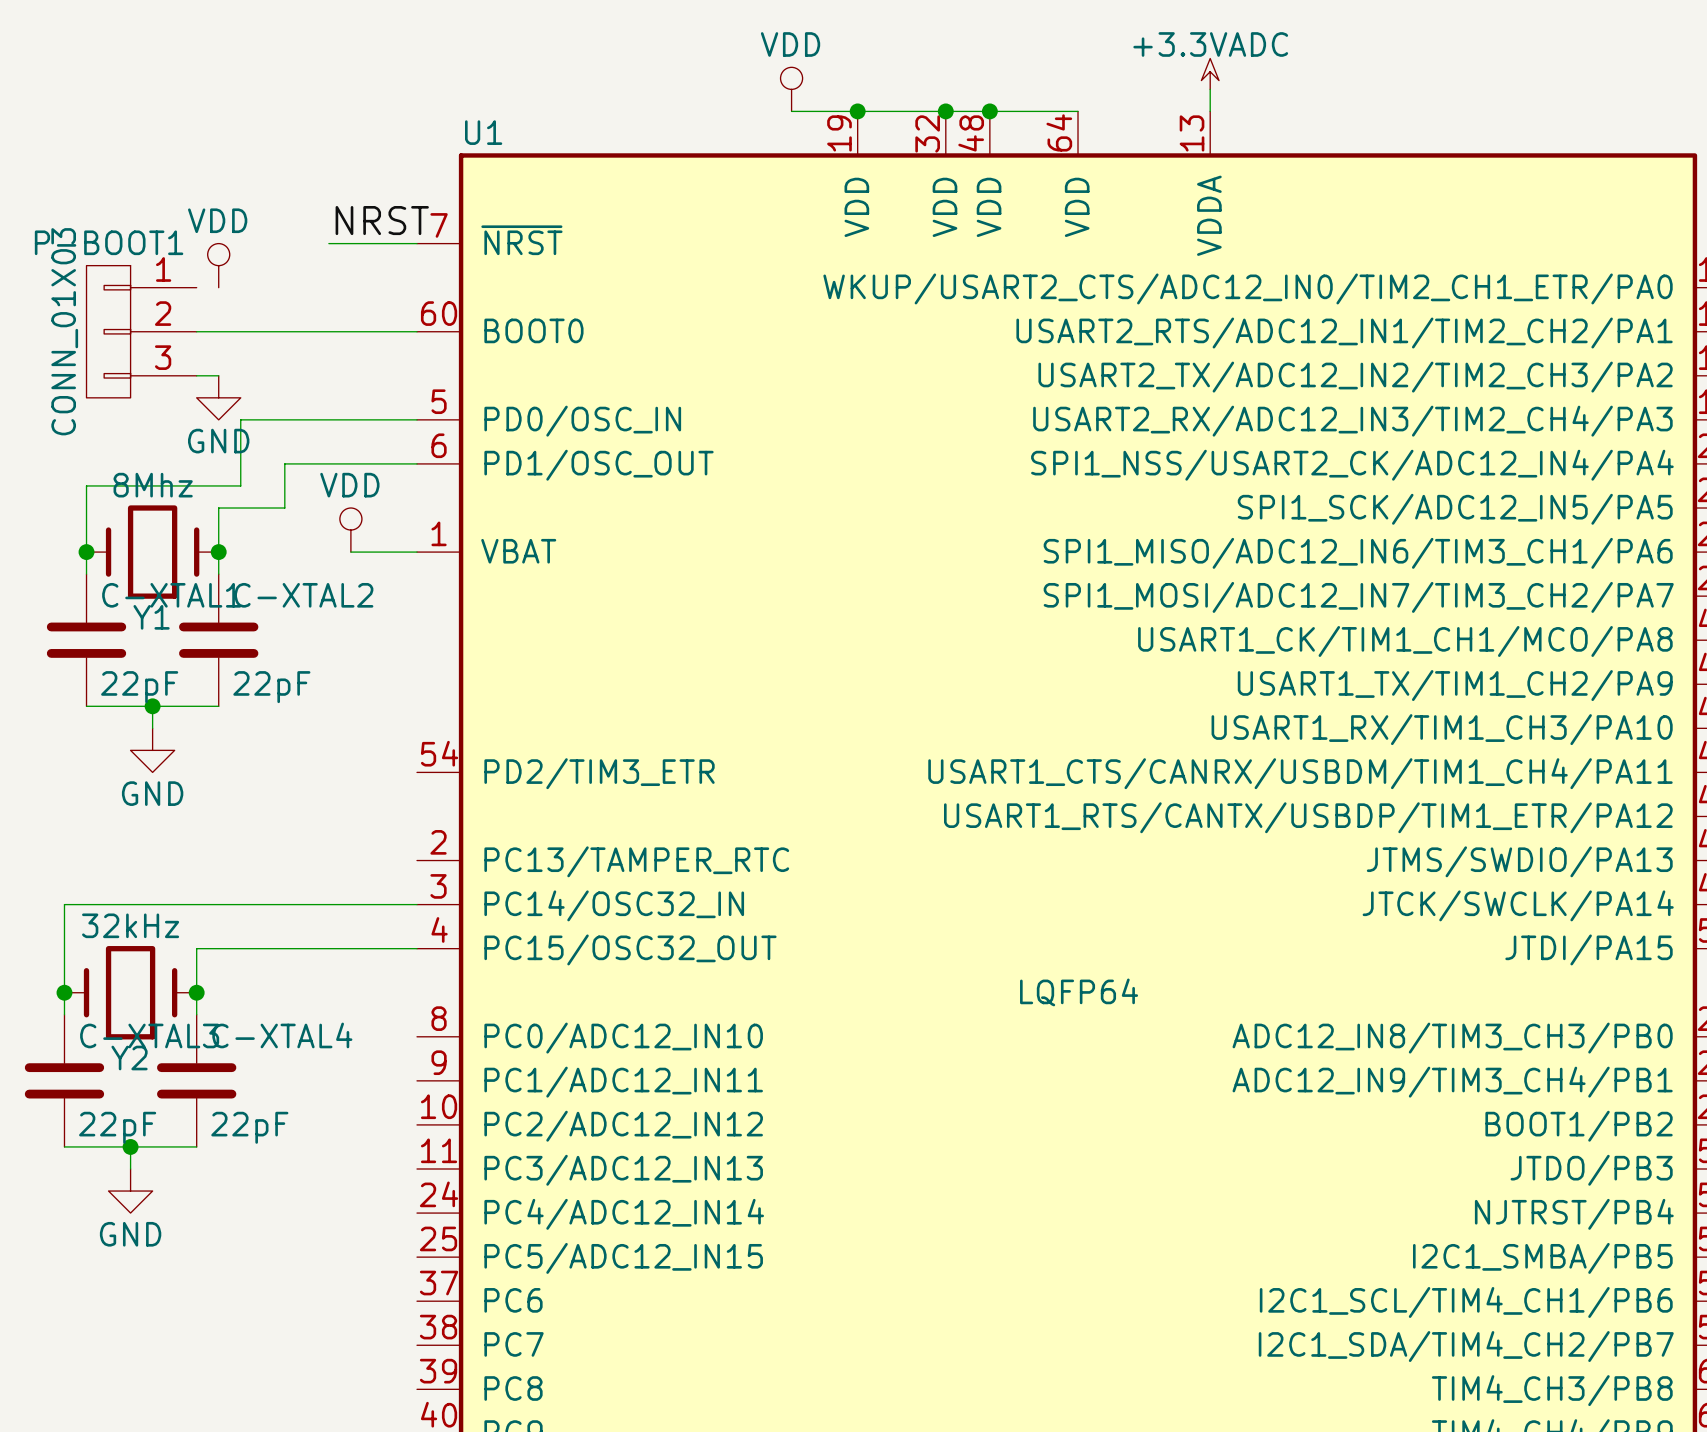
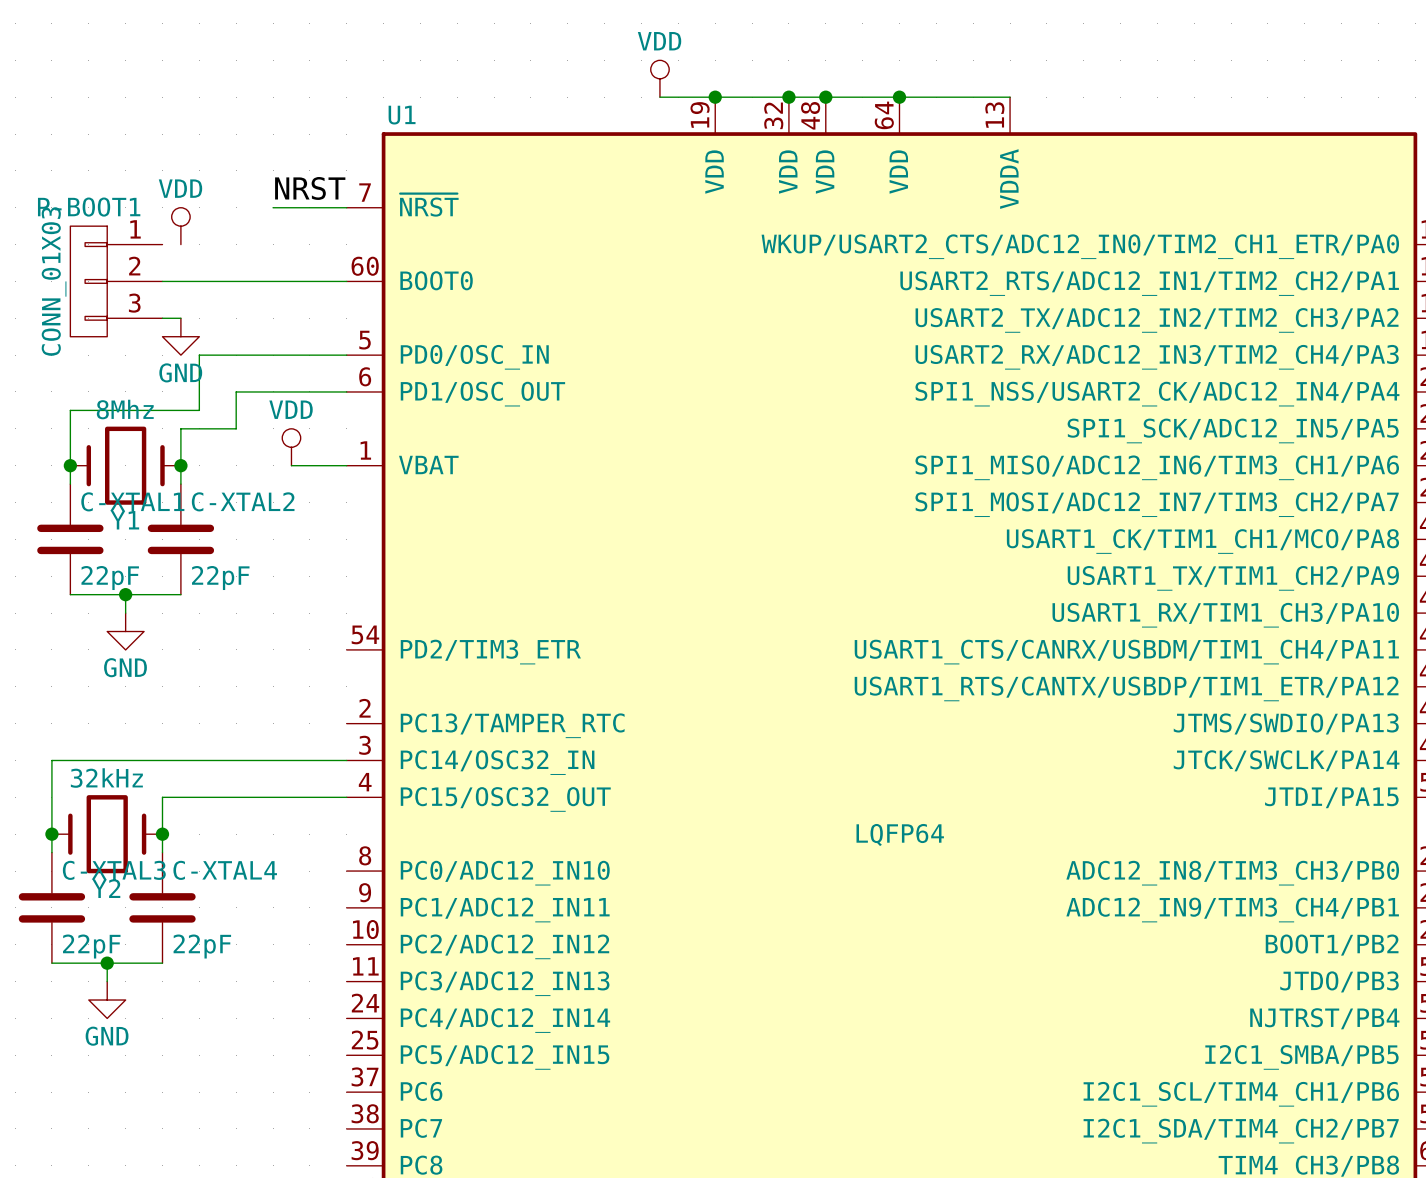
power symbol: +3.3VADC (1210, 73) -> none
wire: (1210, 89) (1210, 111) -> (899, 97) (1010, 97)
junction: none -> (899, 97)

